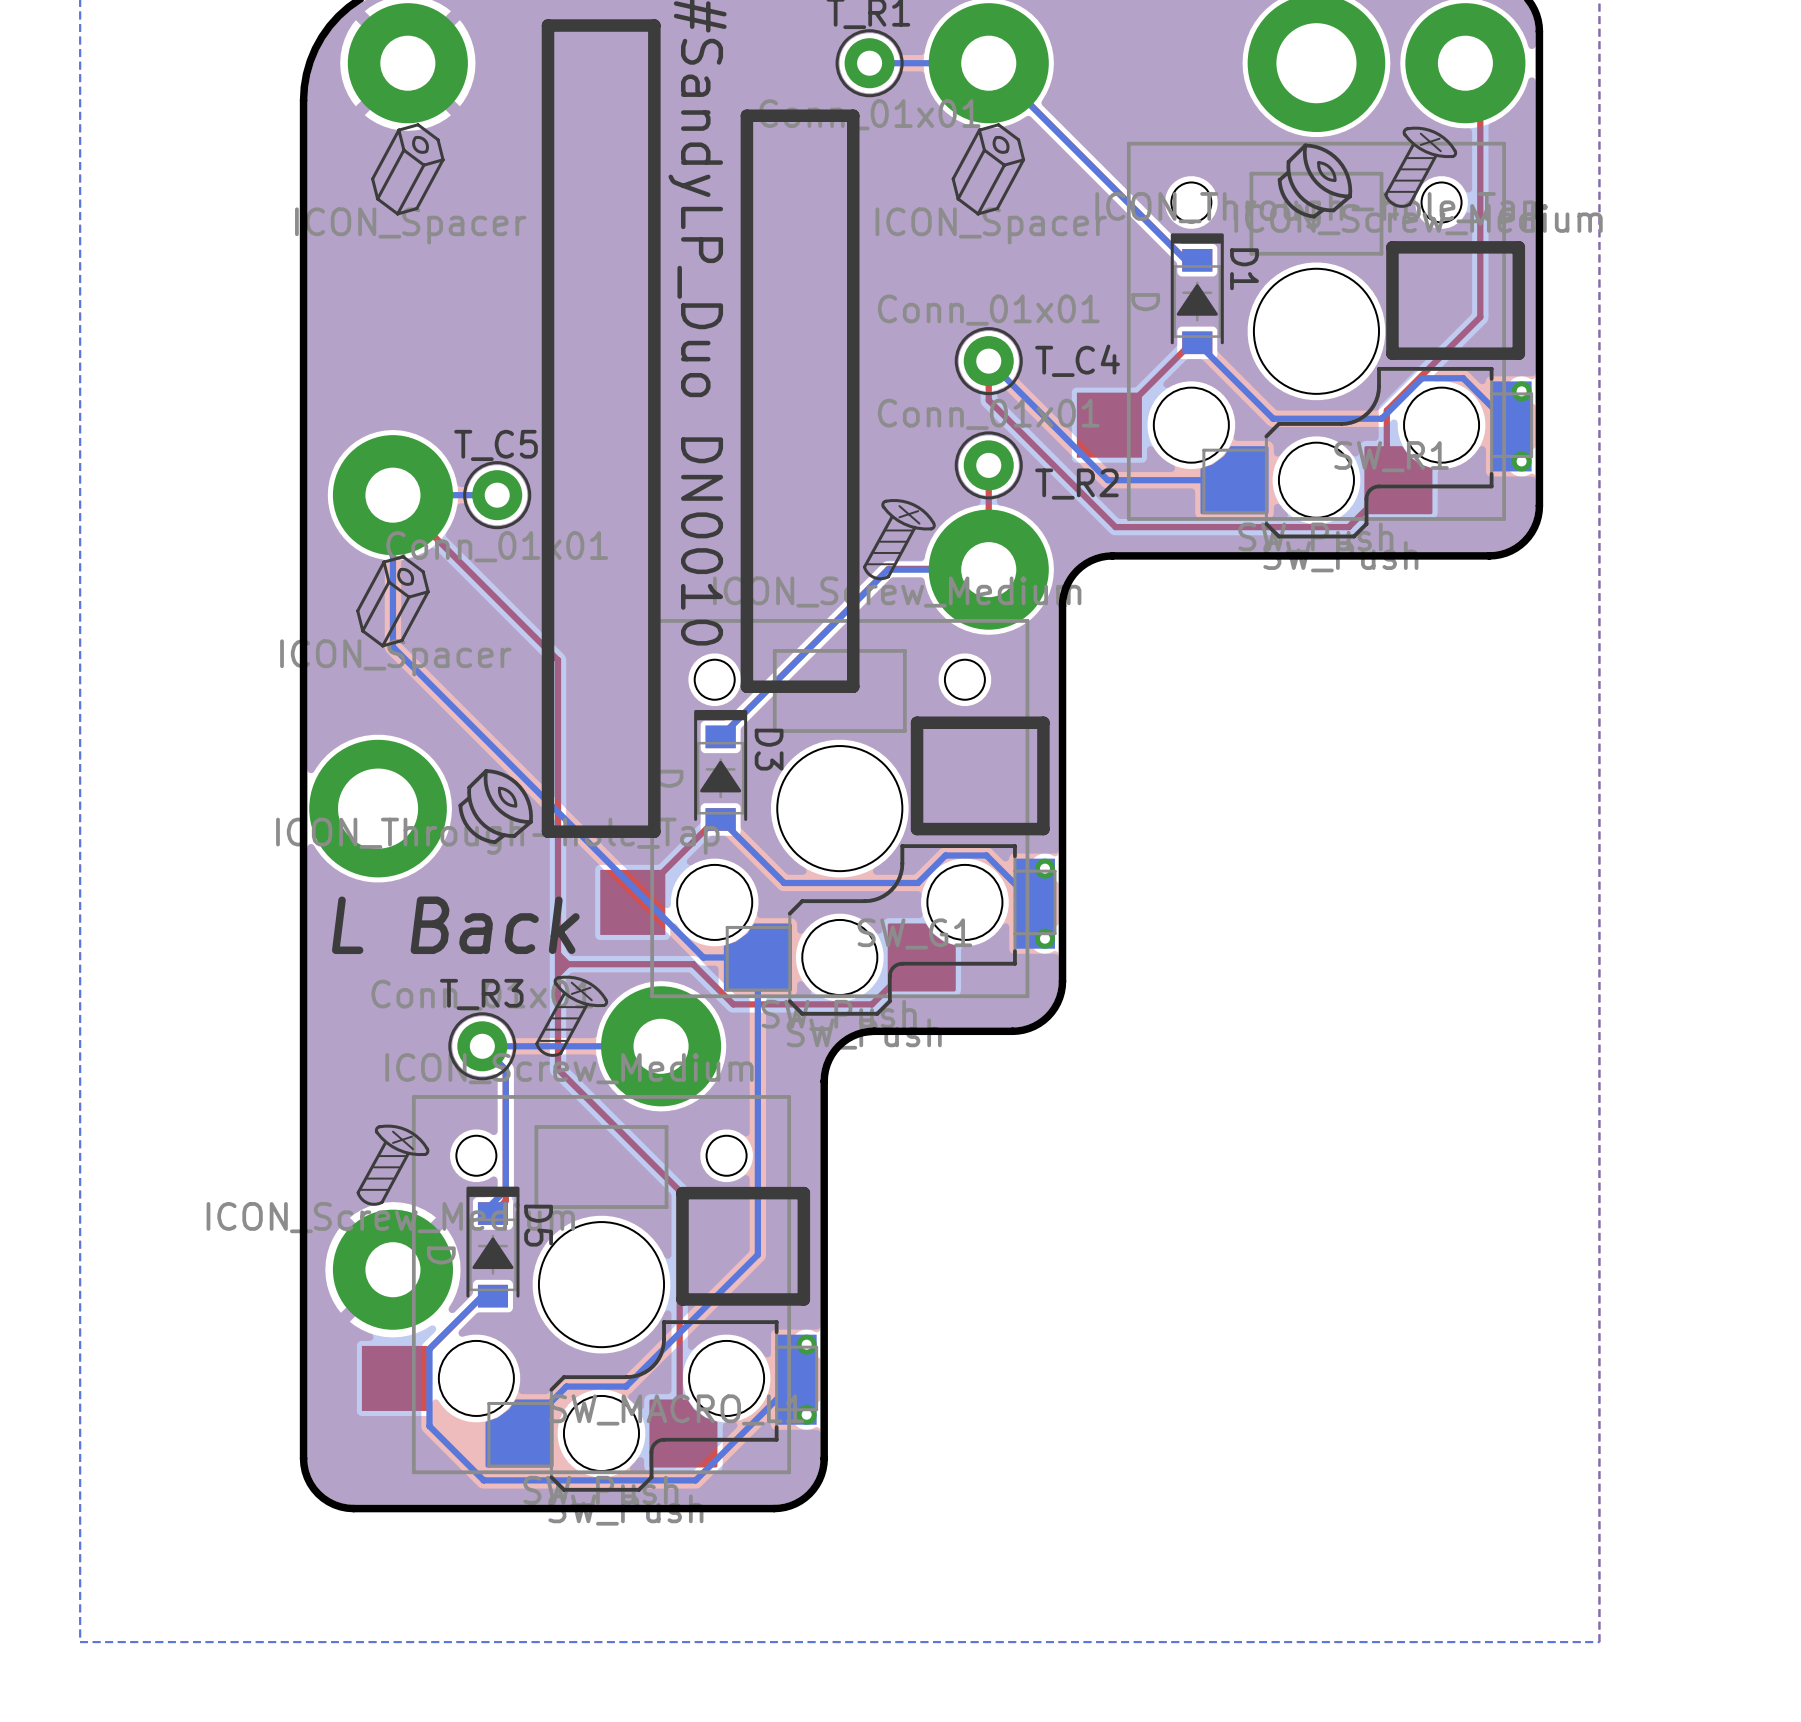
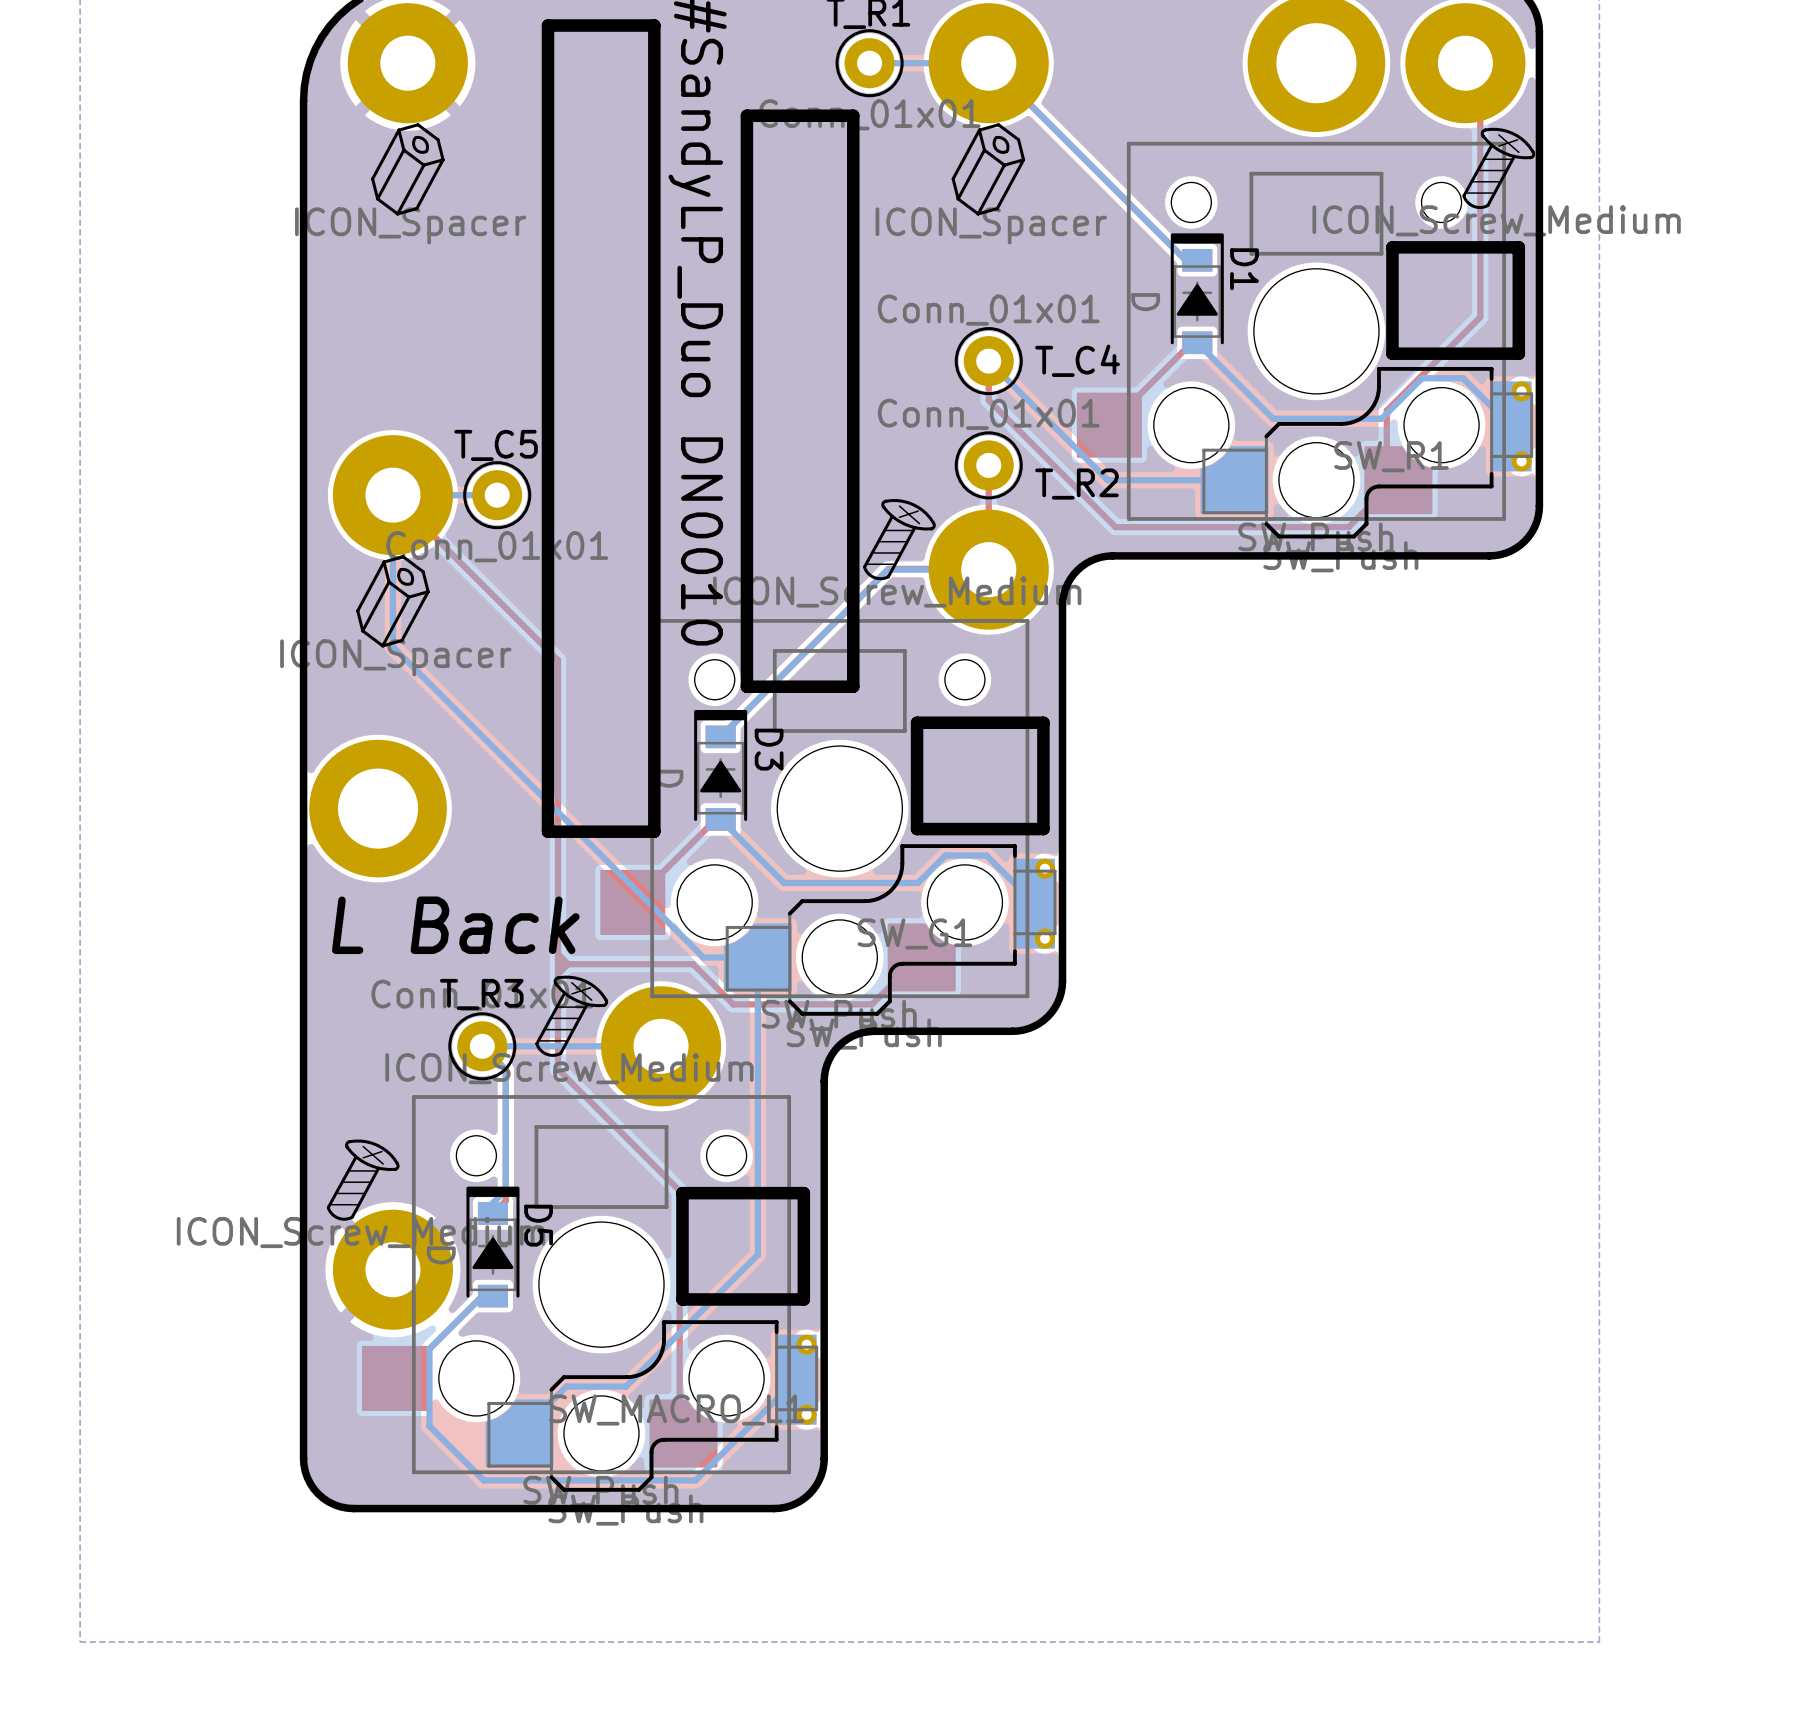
drawing: [1277, 143, 1353, 219] -> none
drawing position: (1420, 167) -> (1498, 168)
drawing: [458, 769, 533, 845] -> none
drawing position: (392, 1165) -> (363, 1180)

